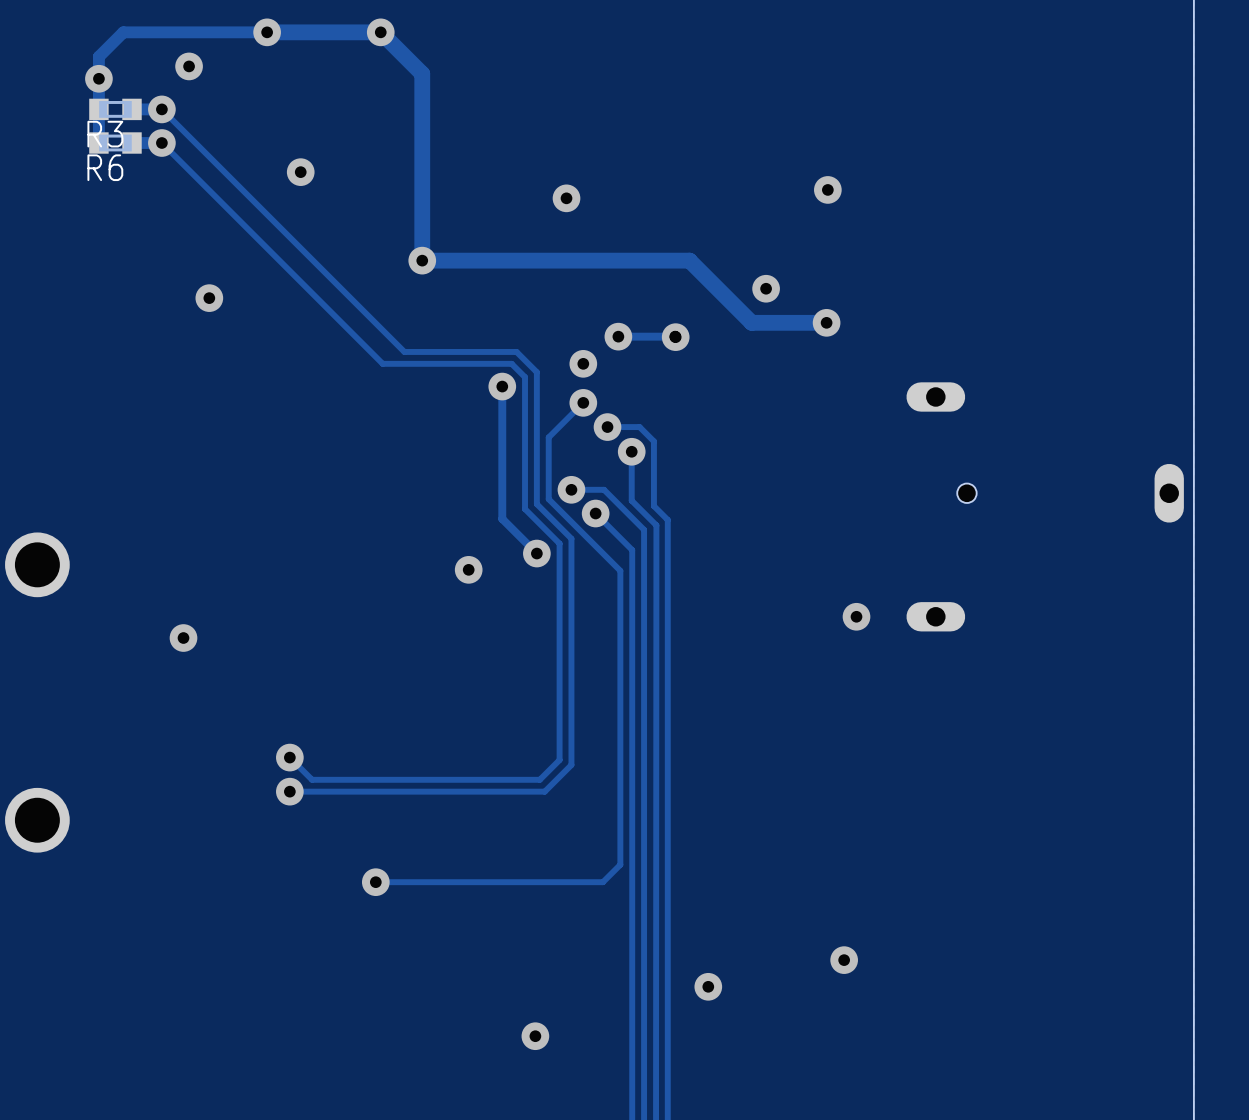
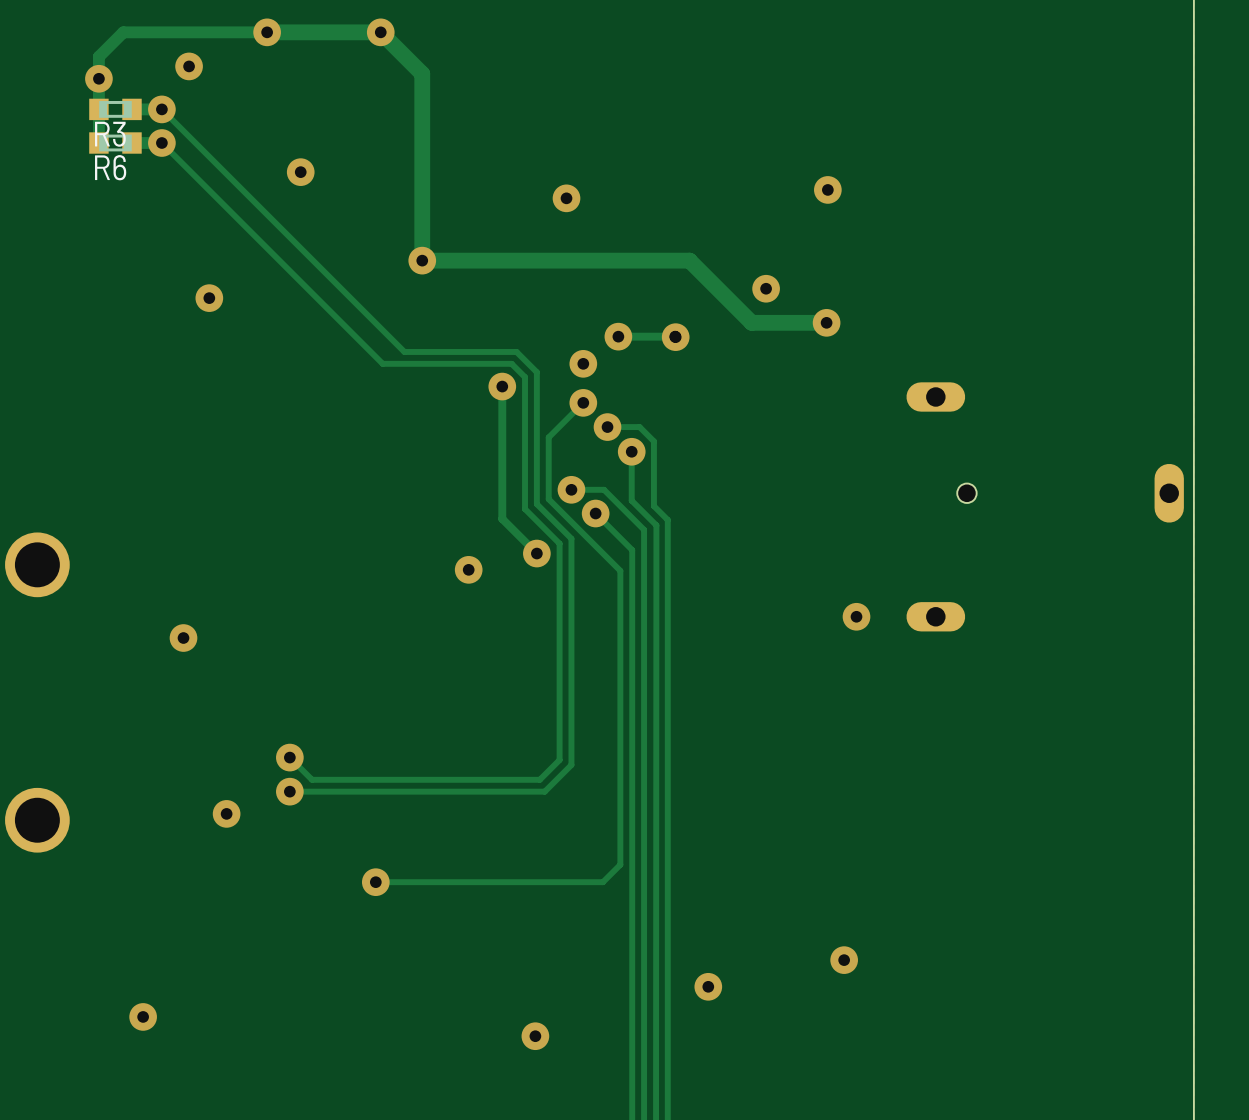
via: none -> (226, 813)
via: none -> (143, 1016)

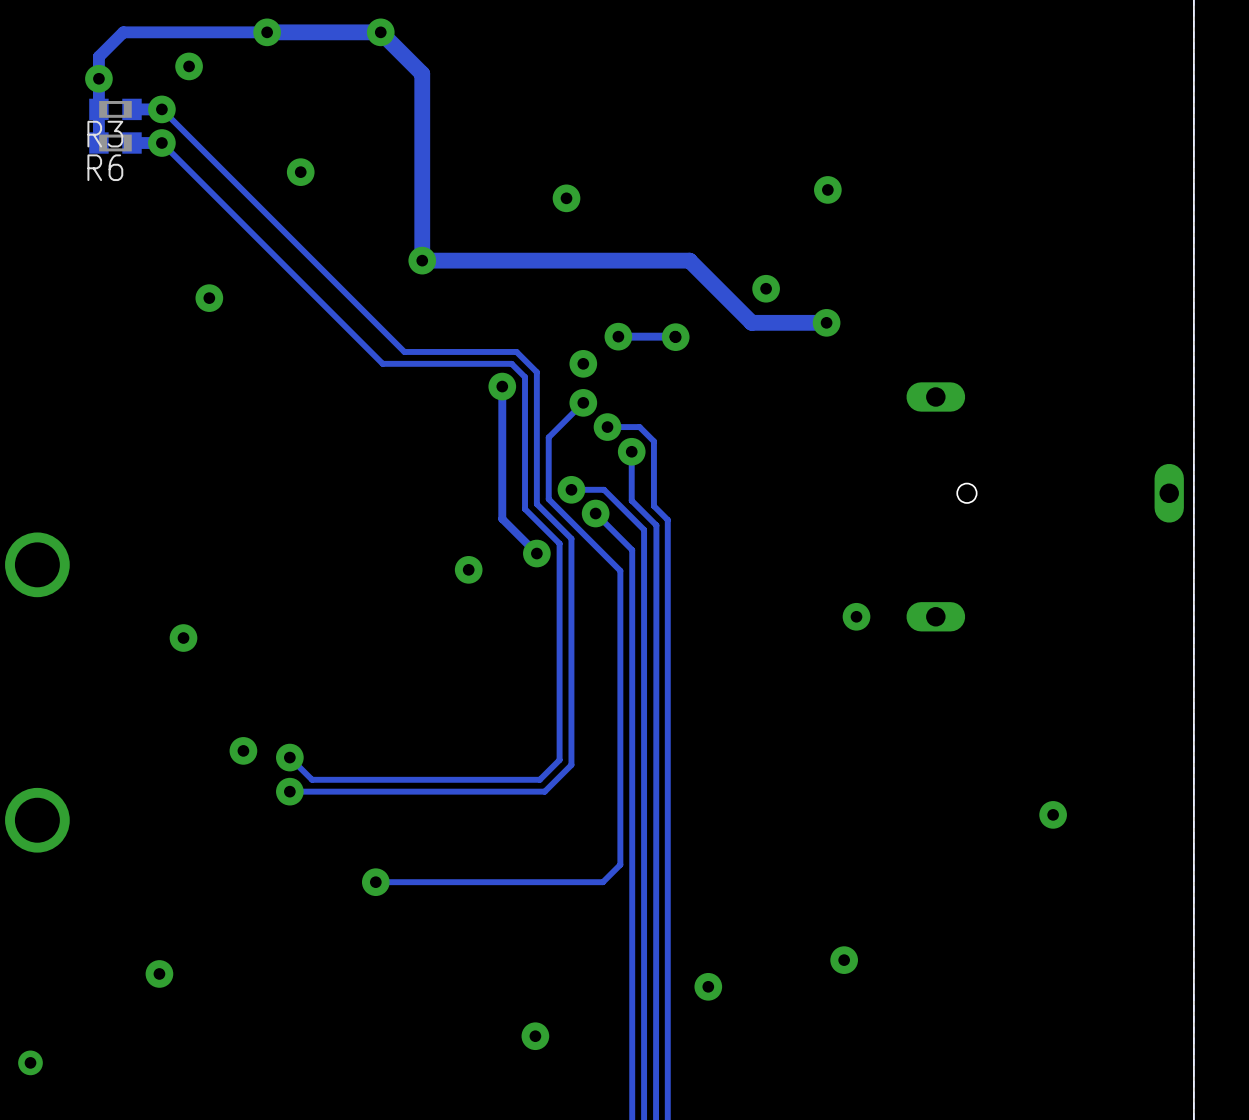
via position: (226, 813) -> (243, 750)
via: none -> (1053, 814)
via position: (143, 1016) -> (159, 973)
via: none -> (30, 1062)

